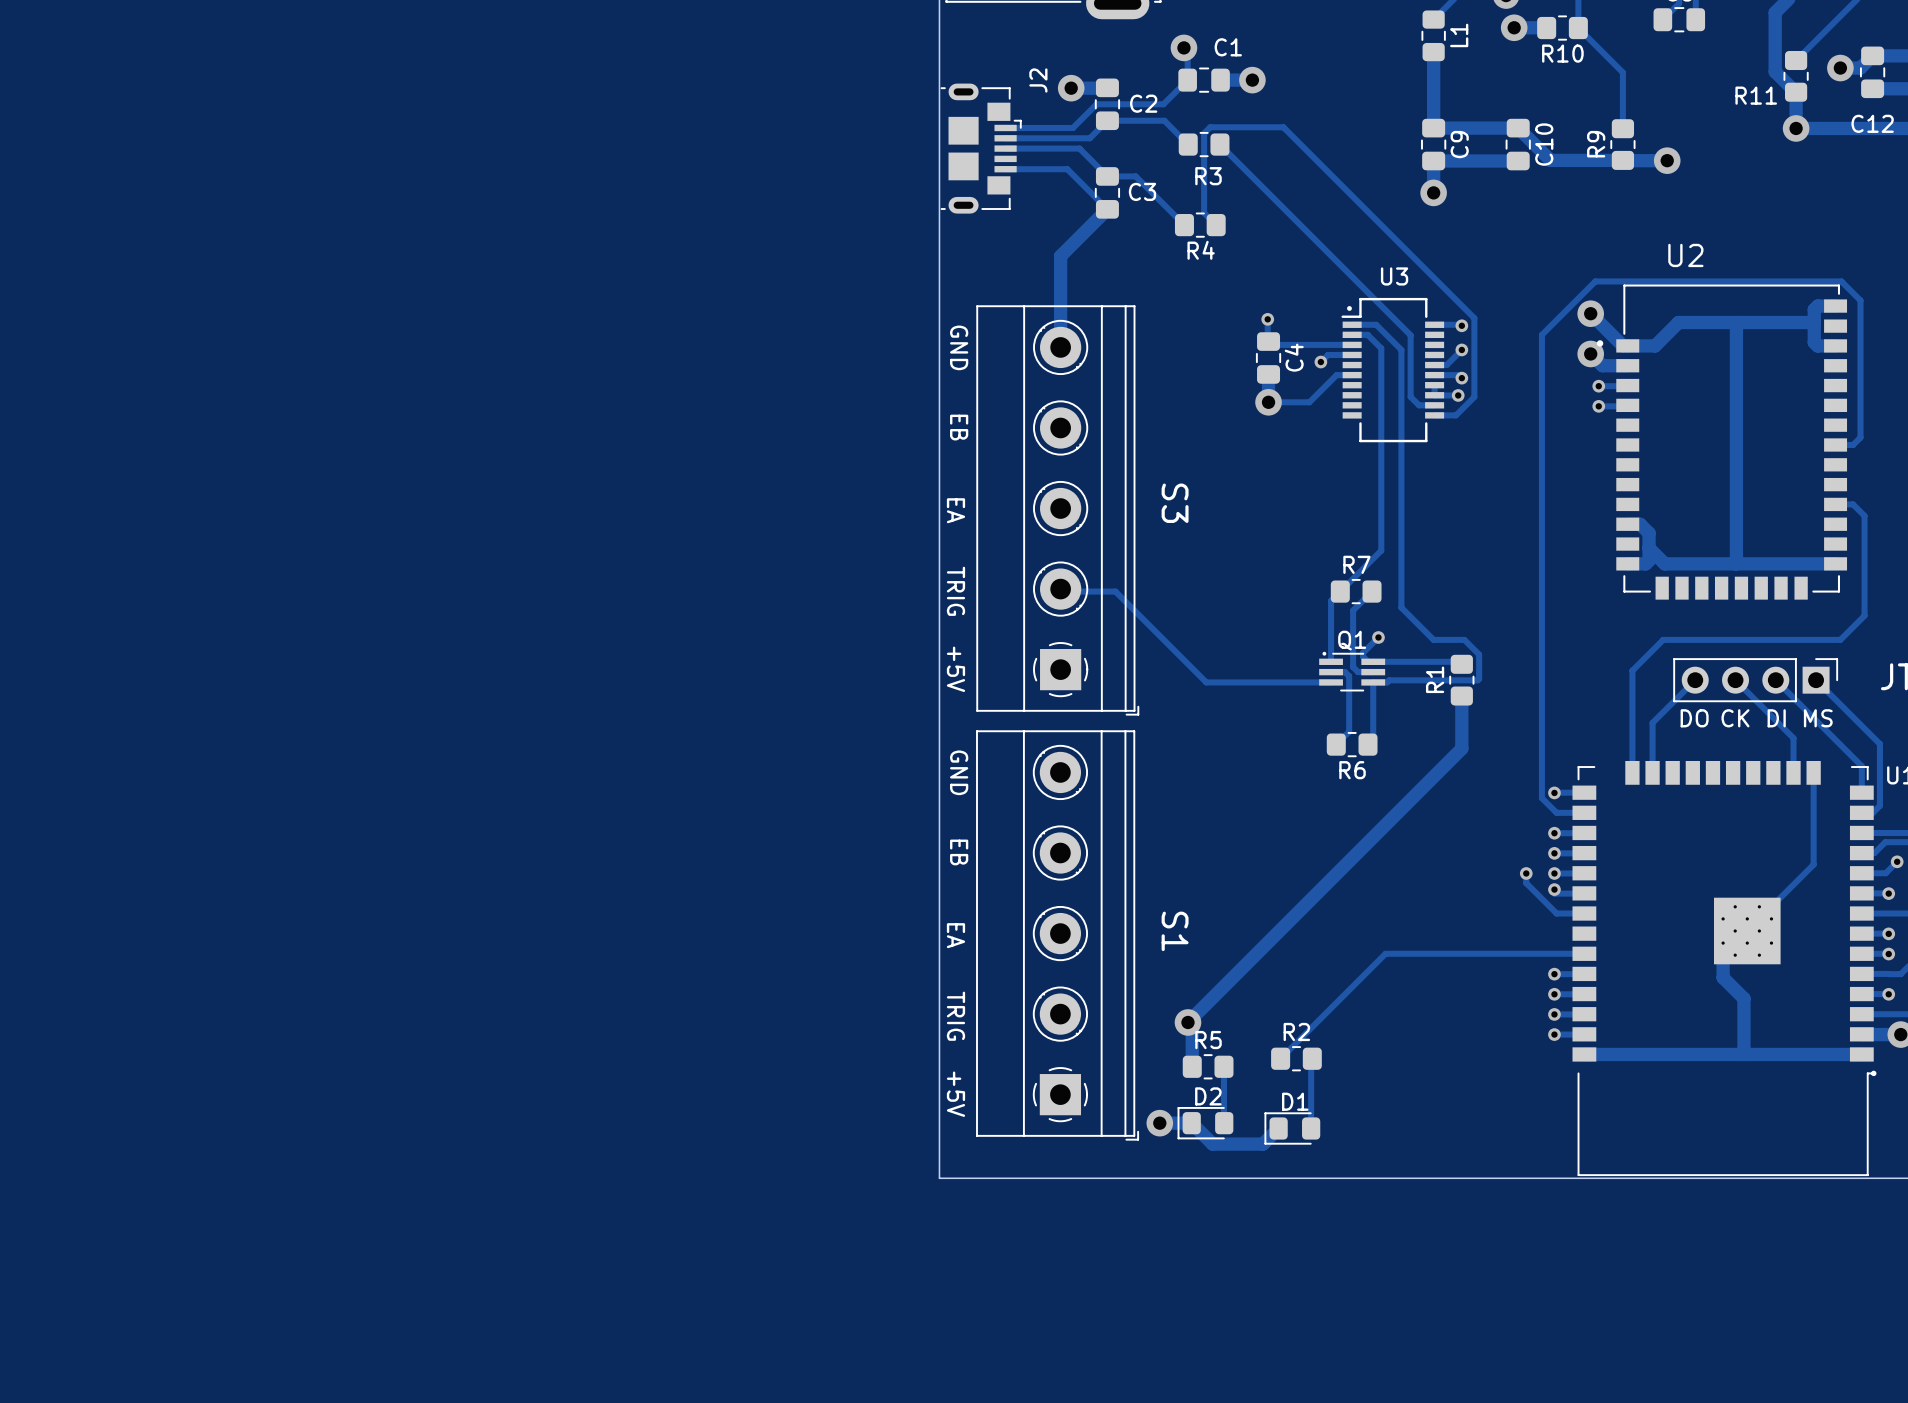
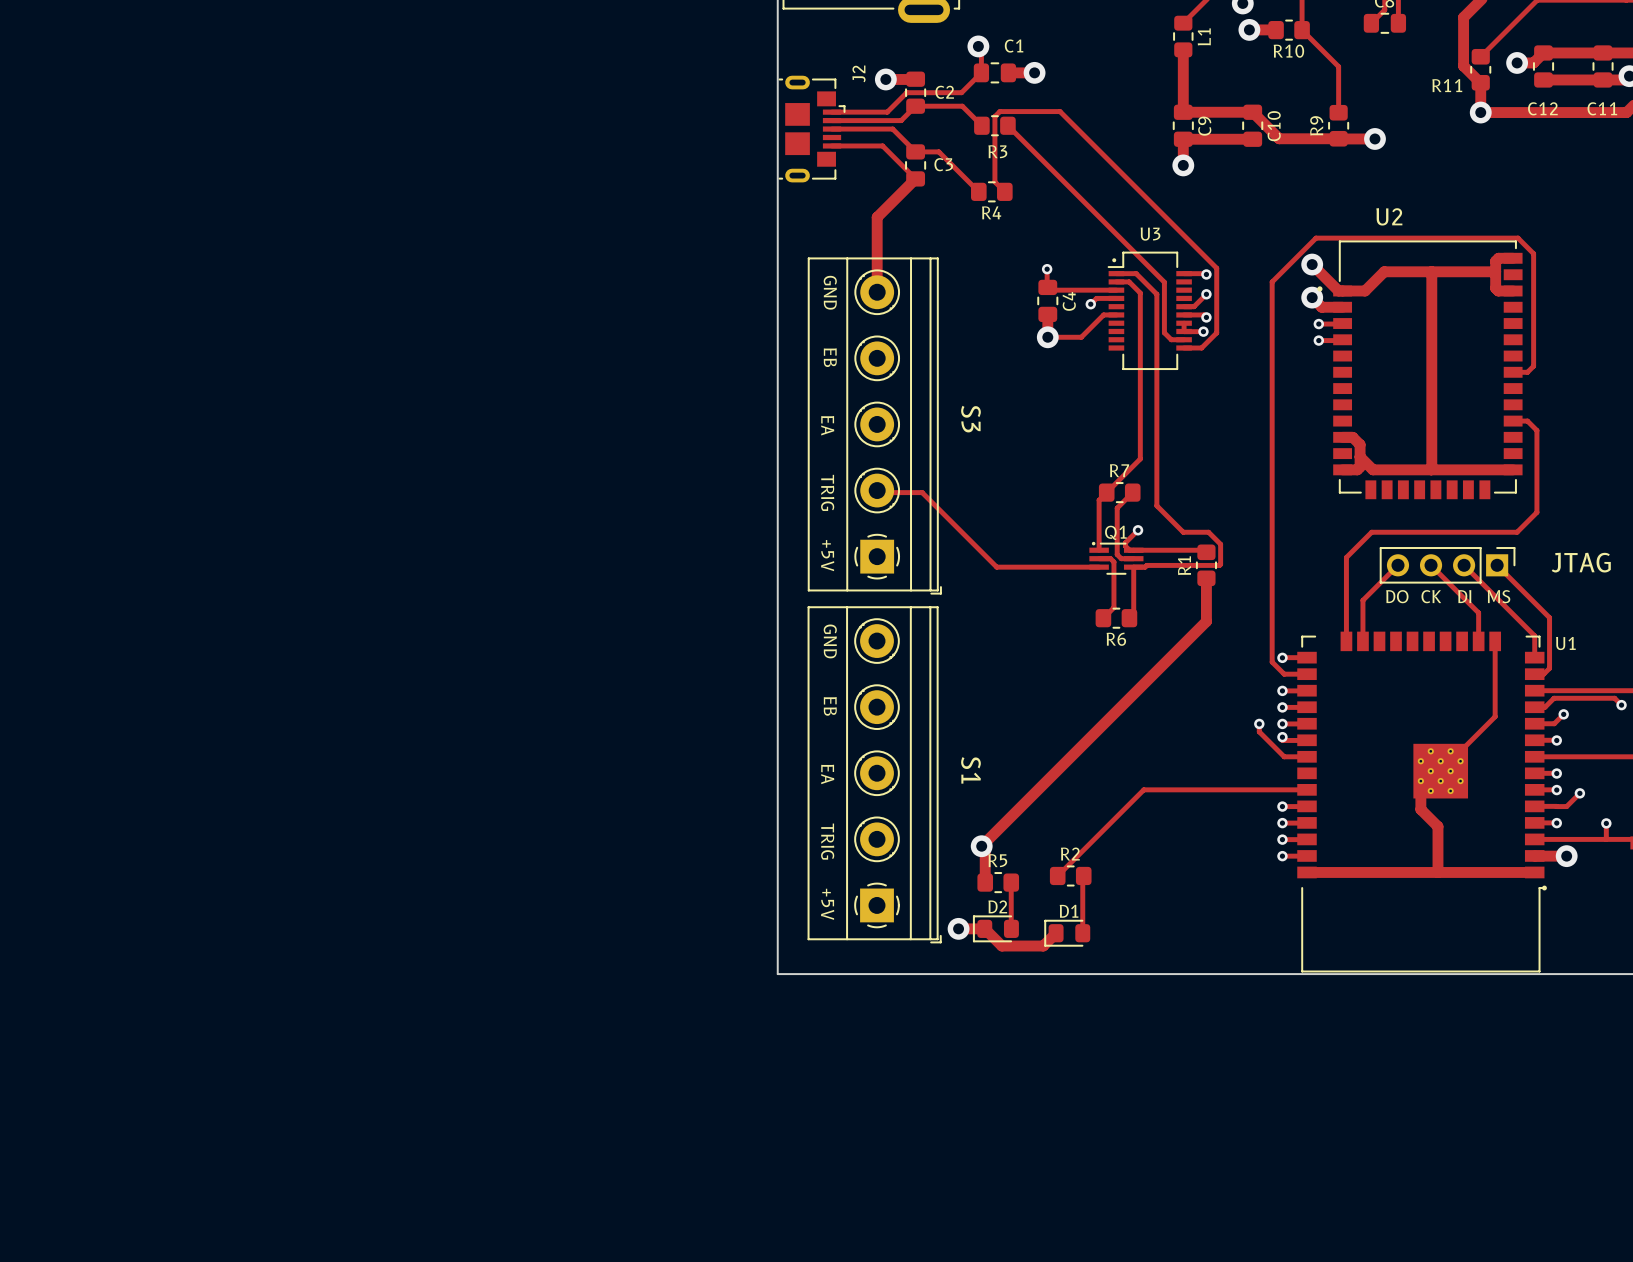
text position: GND (959, 347) -> GND (830, 292)
text position: EB (959, 427) -> EB (830, 357)
text position: EA (955, 510) -> EA (827, 425)
text position: TRIG (955, 591) -> TRIG (827, 492)
text position: +5V (955, 669) -> +5V (827, 555)
text position: GND (959, 772) -> GND (830, 641)
text position: EB (959, 852) -> EB (830, 706)
text position: EA (955, 935) -> EA (827, 774)
text position: TRIG (955, 1016) -> TRIG (827, 841)
text position: +5V (955, 1094) -> +5V (827, 904)

